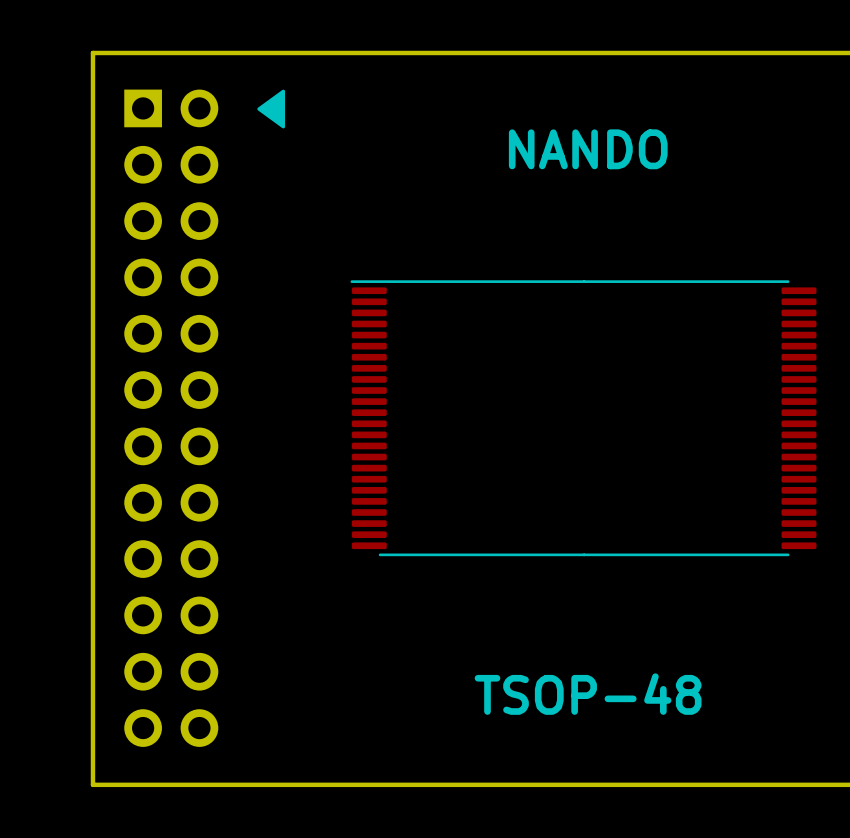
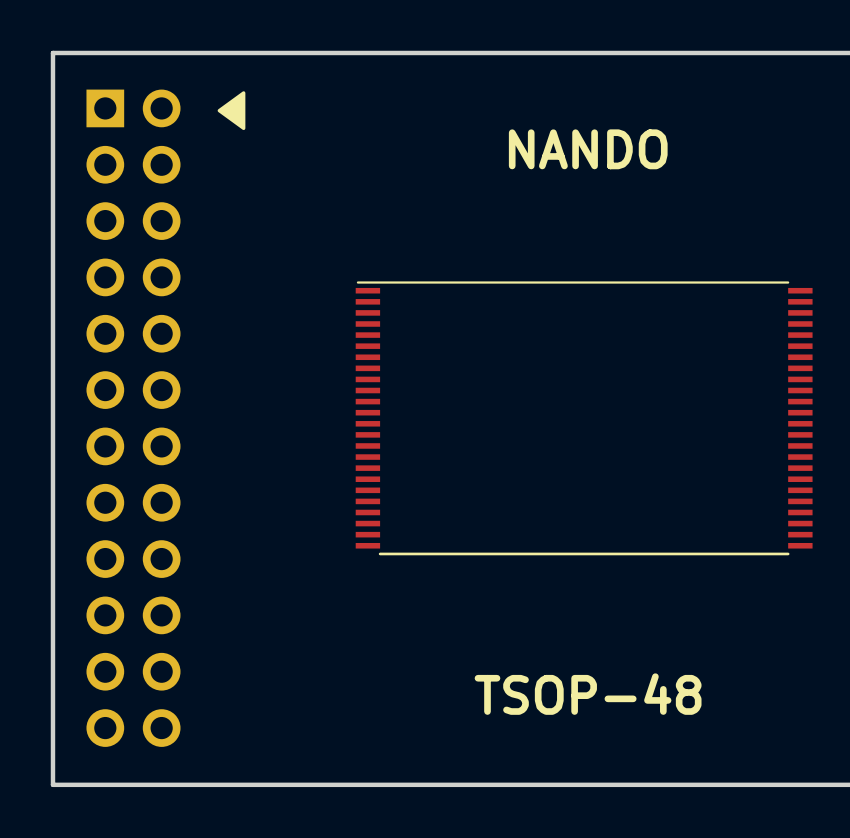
board edge: (92, 52) (92, 784) -> (92, 52) (52, 52) (52, 784) (92, 784)
drawing position: (271, 109) -> (231, 110)
part footprint: [350, 280, 817, 557] -> [355, 281, 813, 556]
part position: (171, 418) -> (133, 418)

